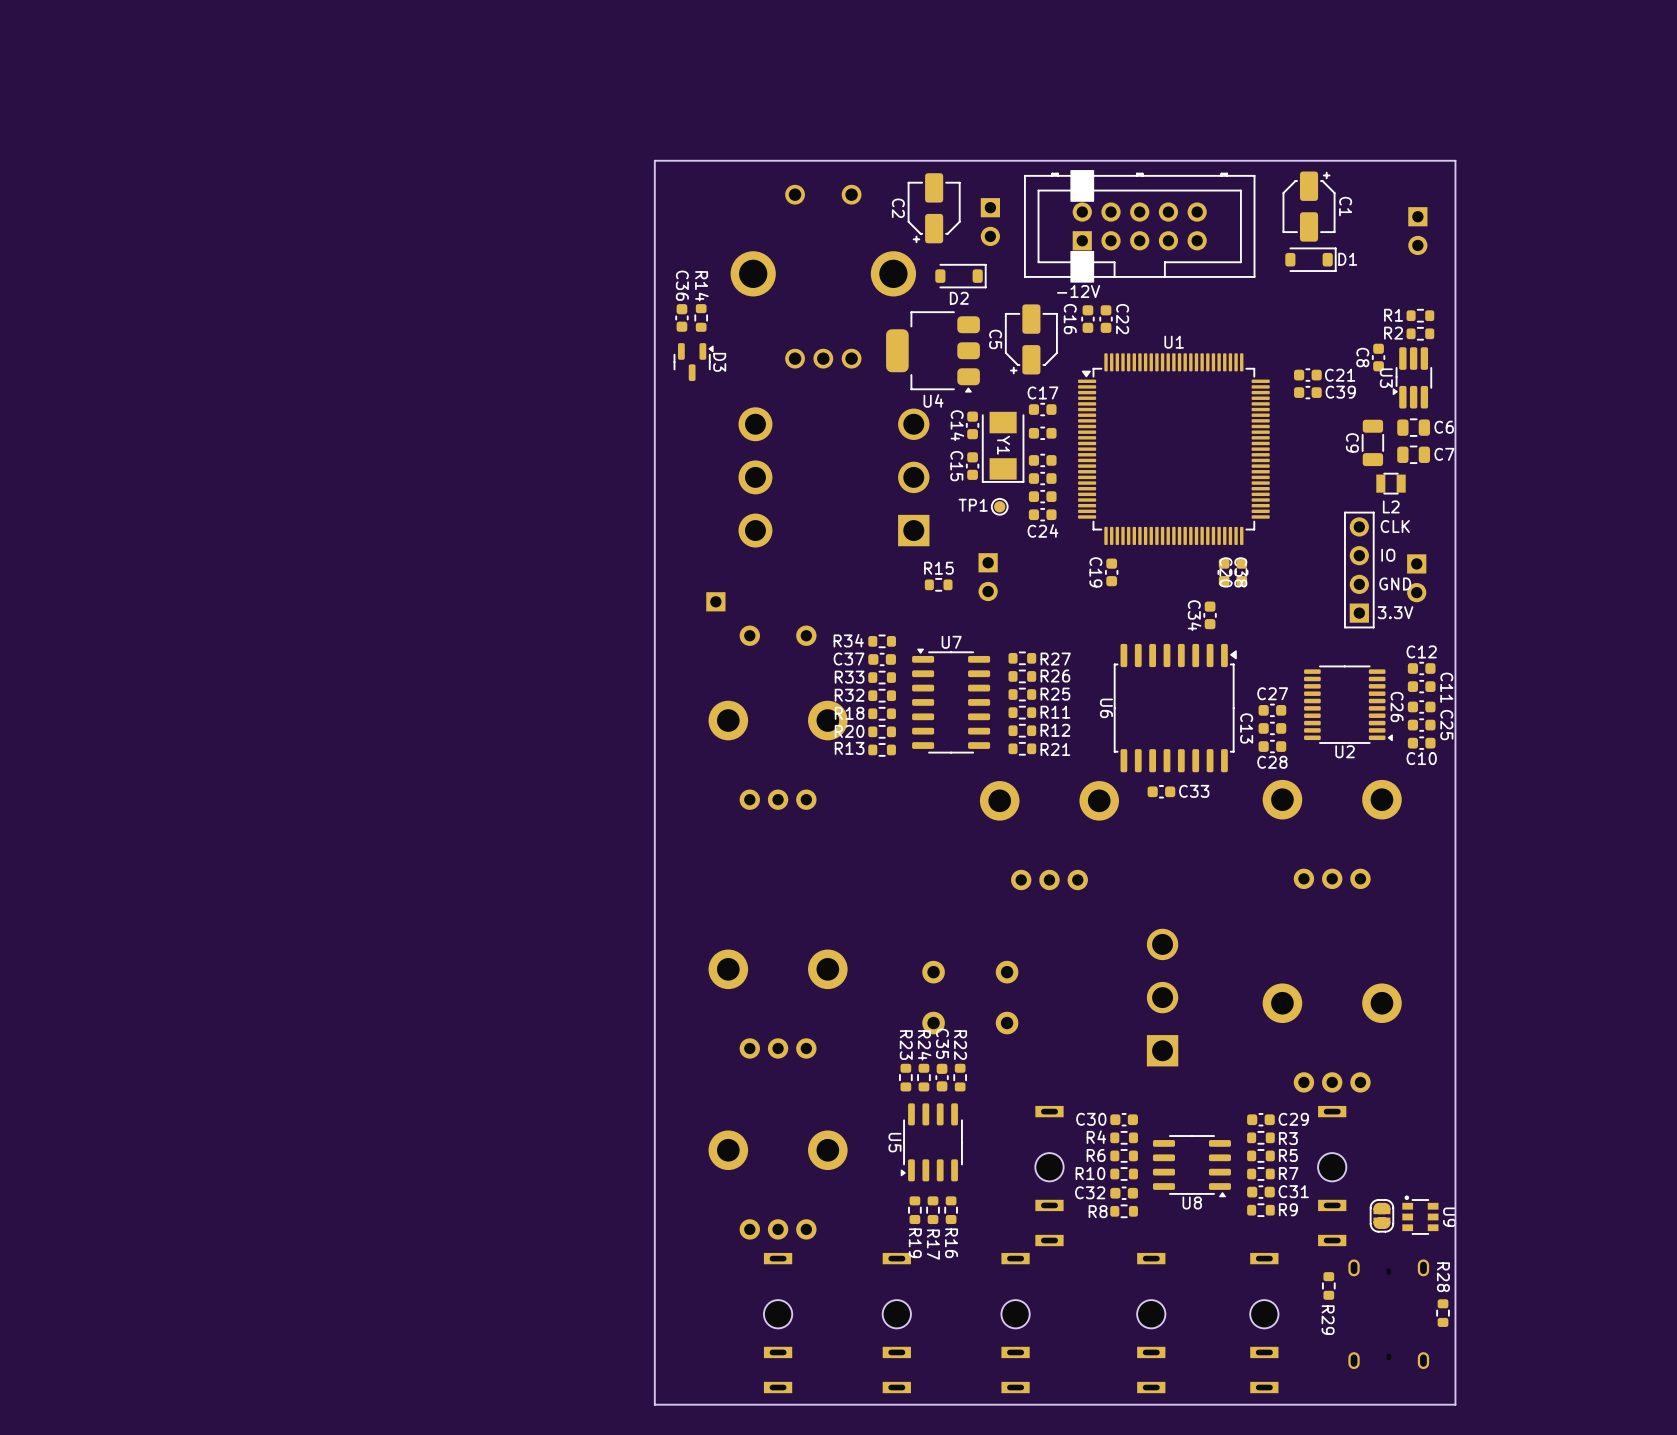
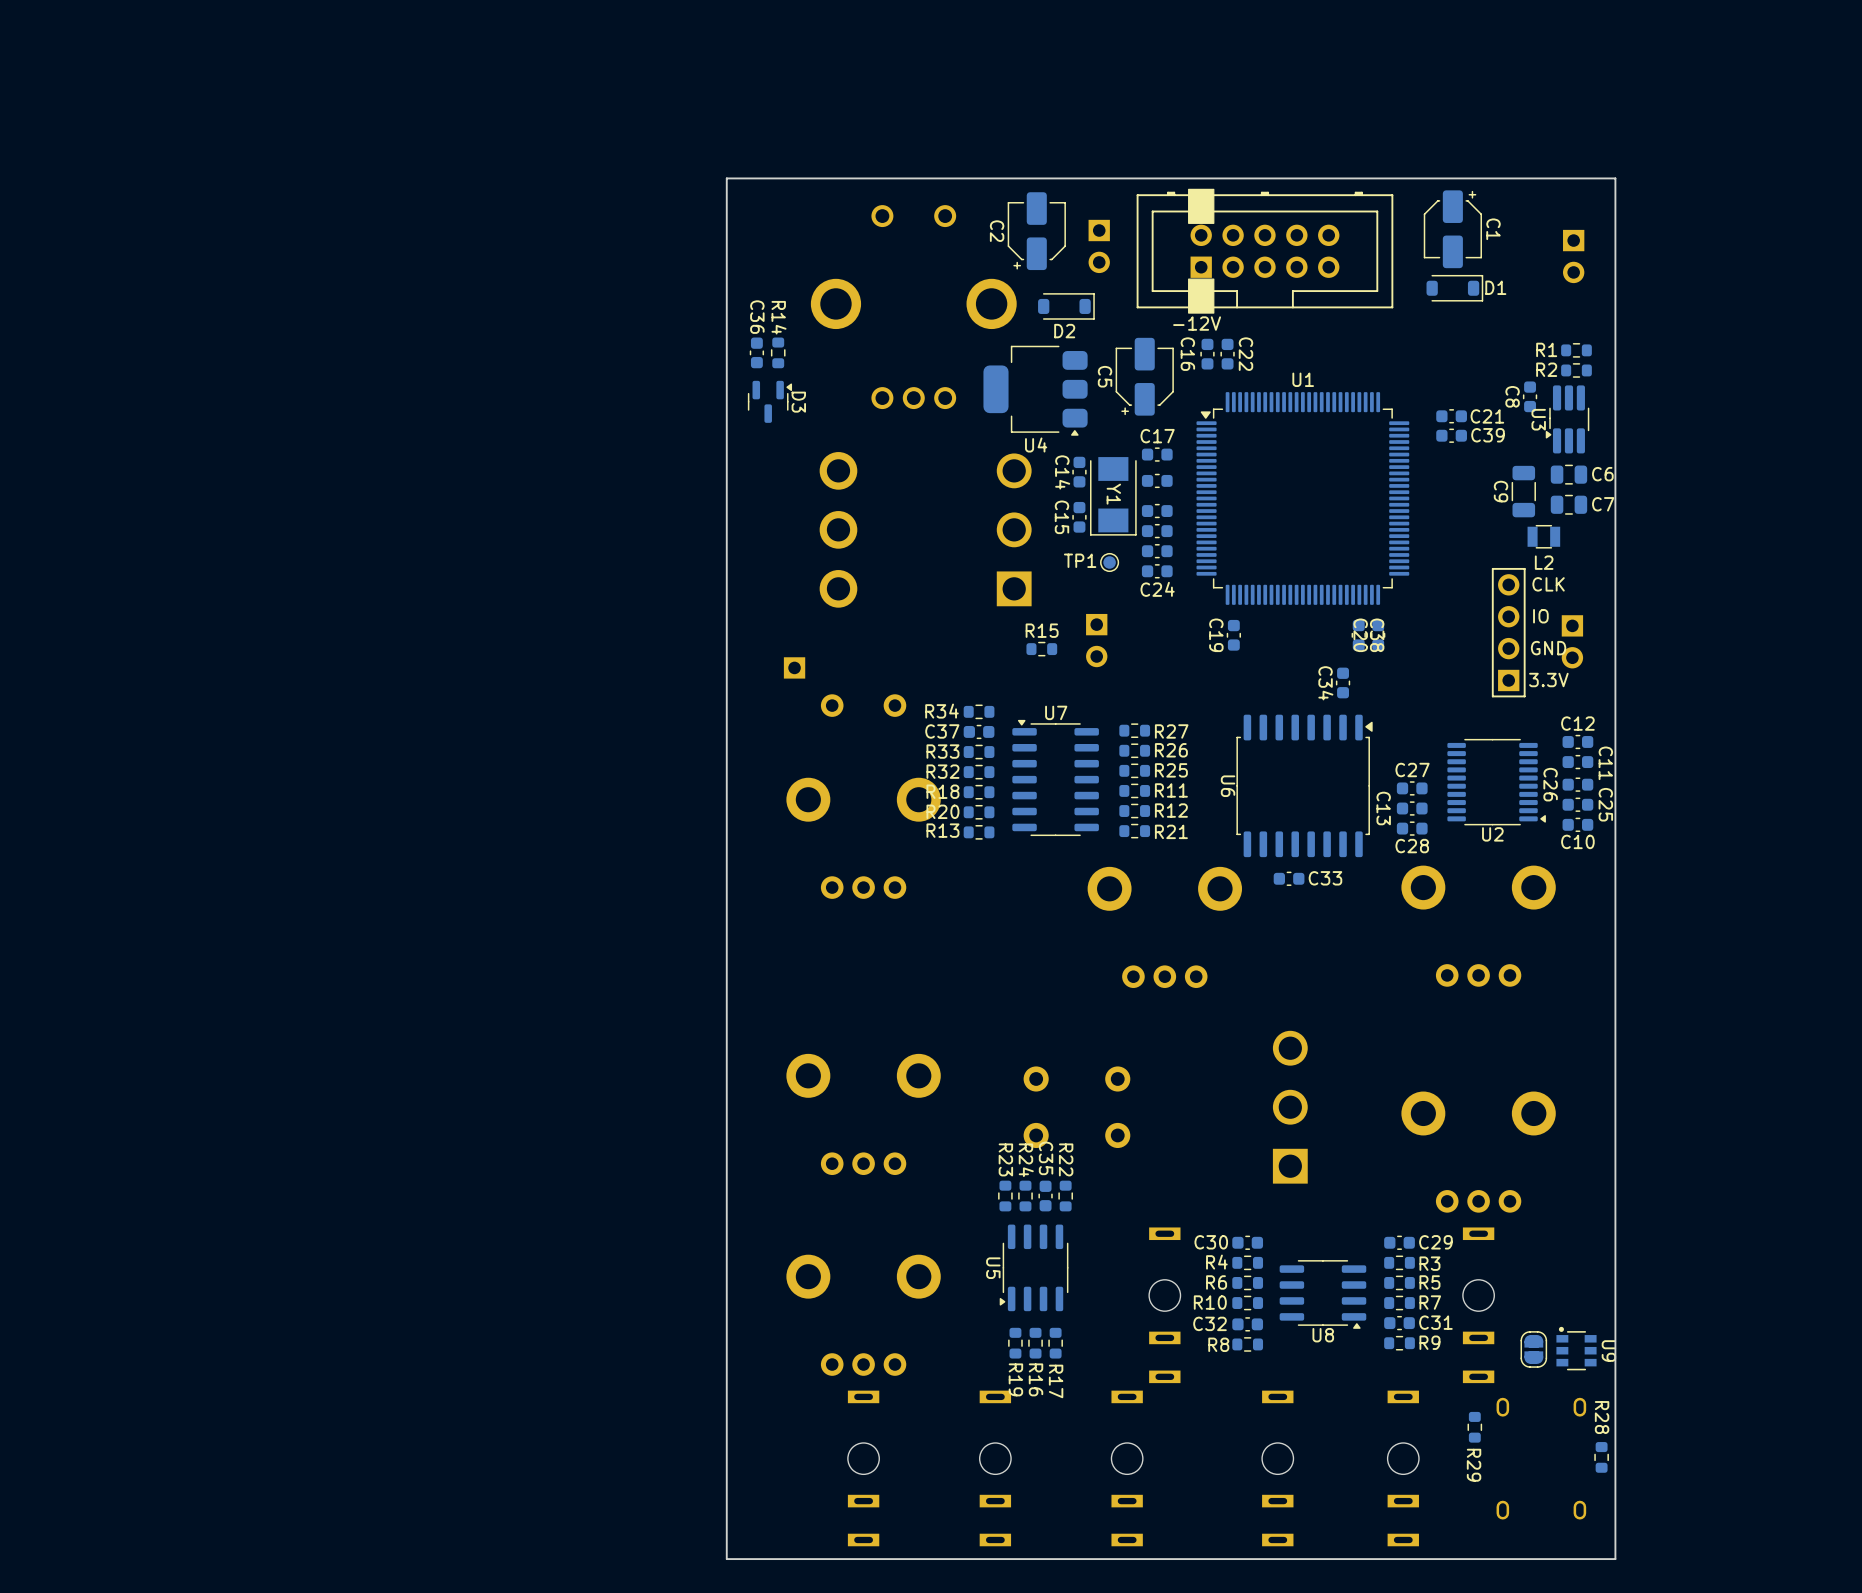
R16 name: R16 (951, 1243) -> R17 (1056, 1381)
R17 name: R17 (933, 1244) -> R16 (1036, 1379)

